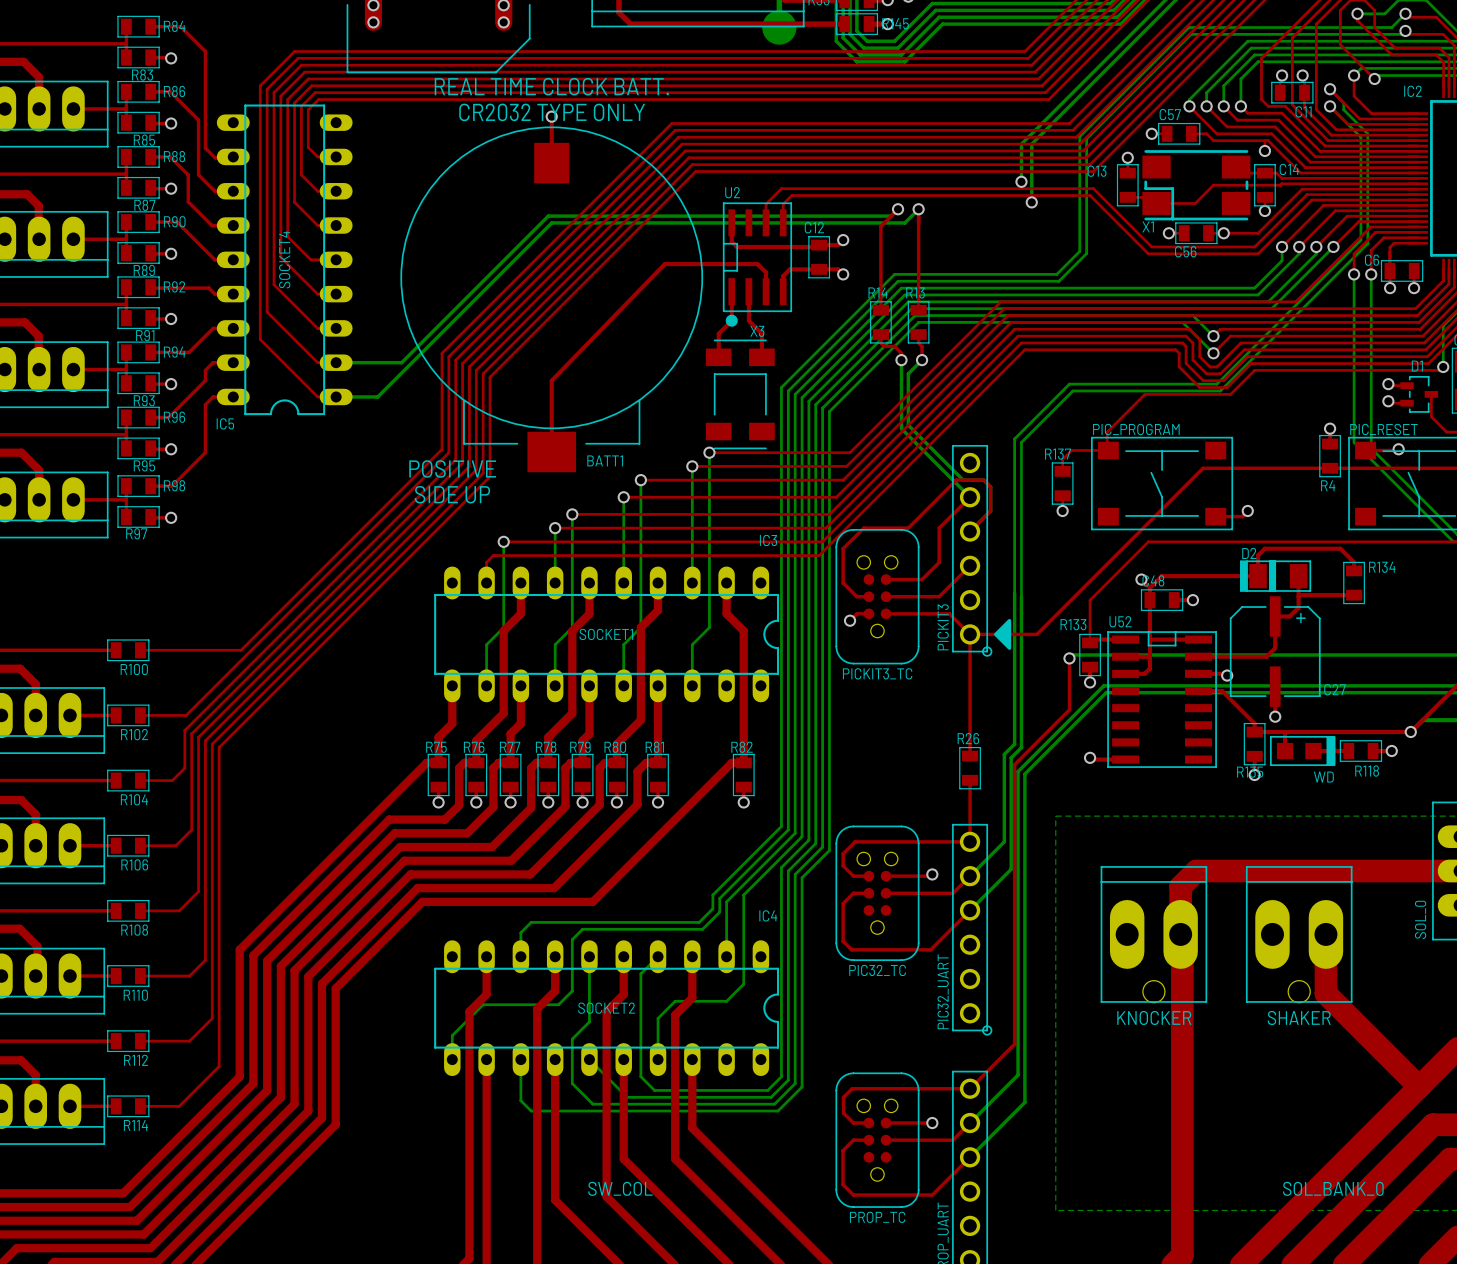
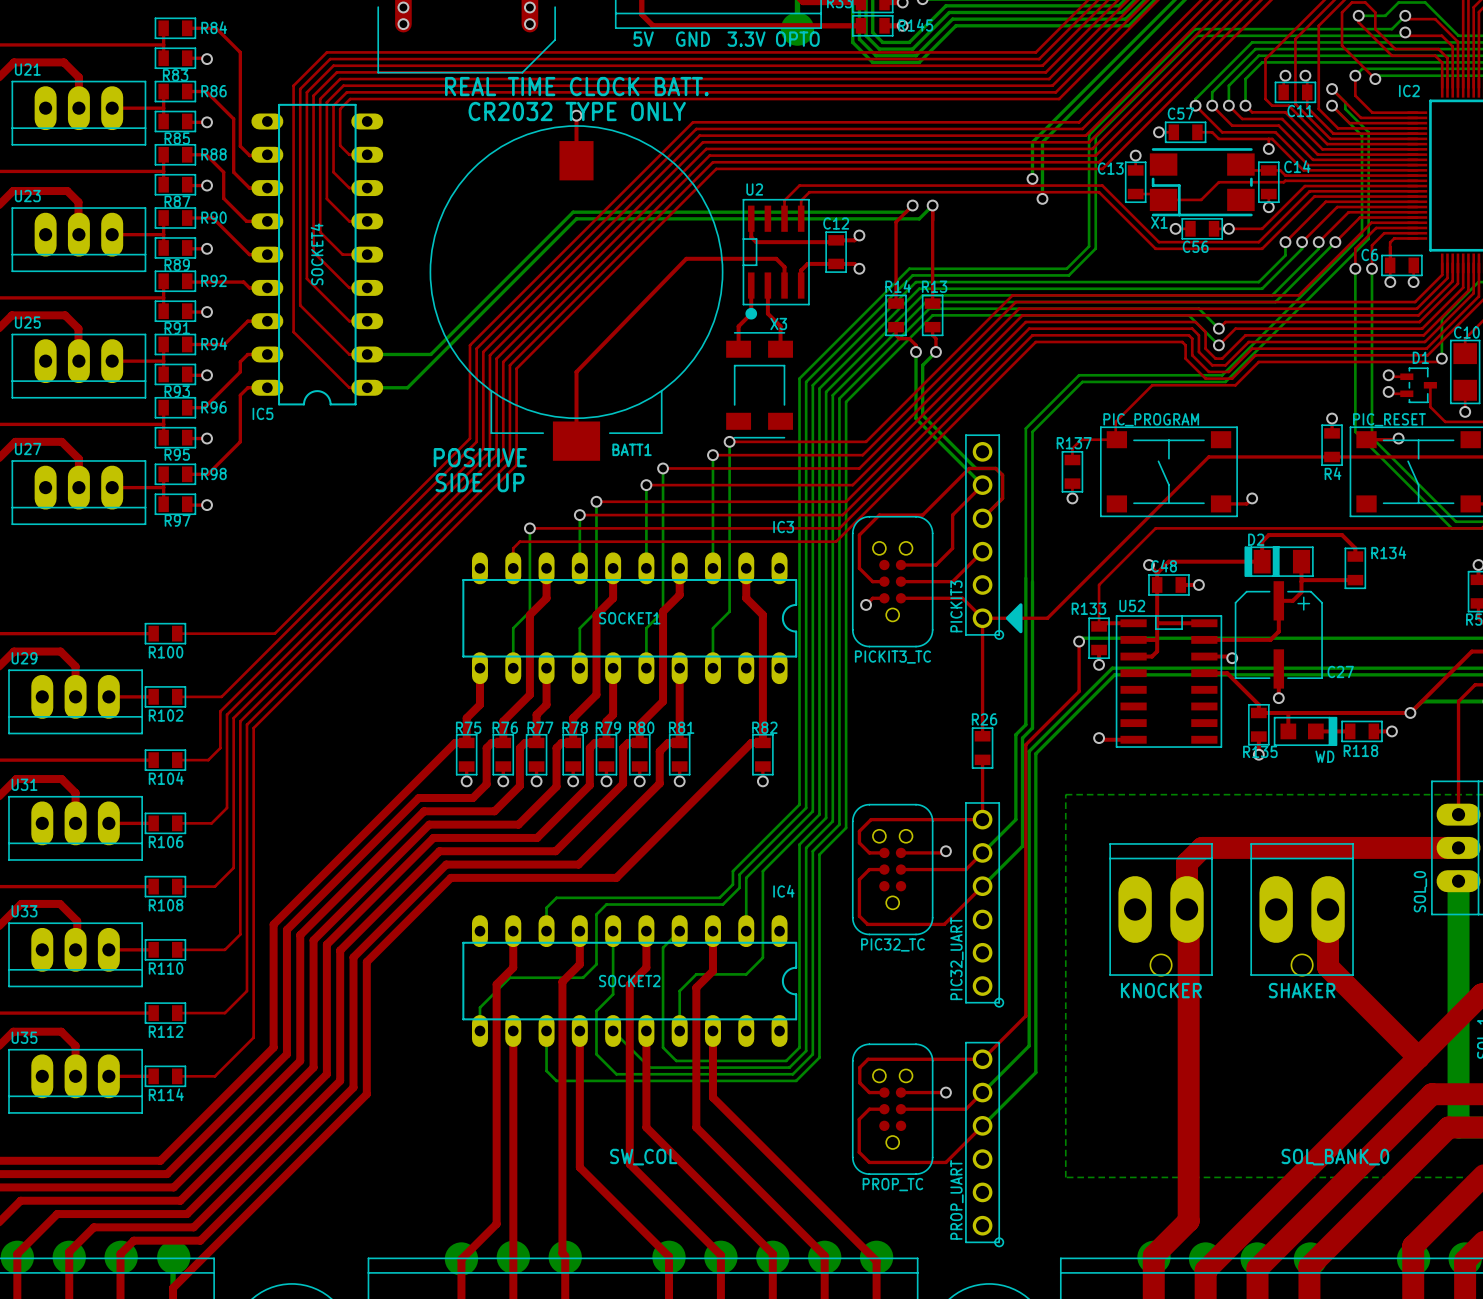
text: none -> 5V (643, 39)
text: none -> GND (693, 39)
text: none -> 3.3V (746, 39)
text: none -> OPTO (797, 39)

